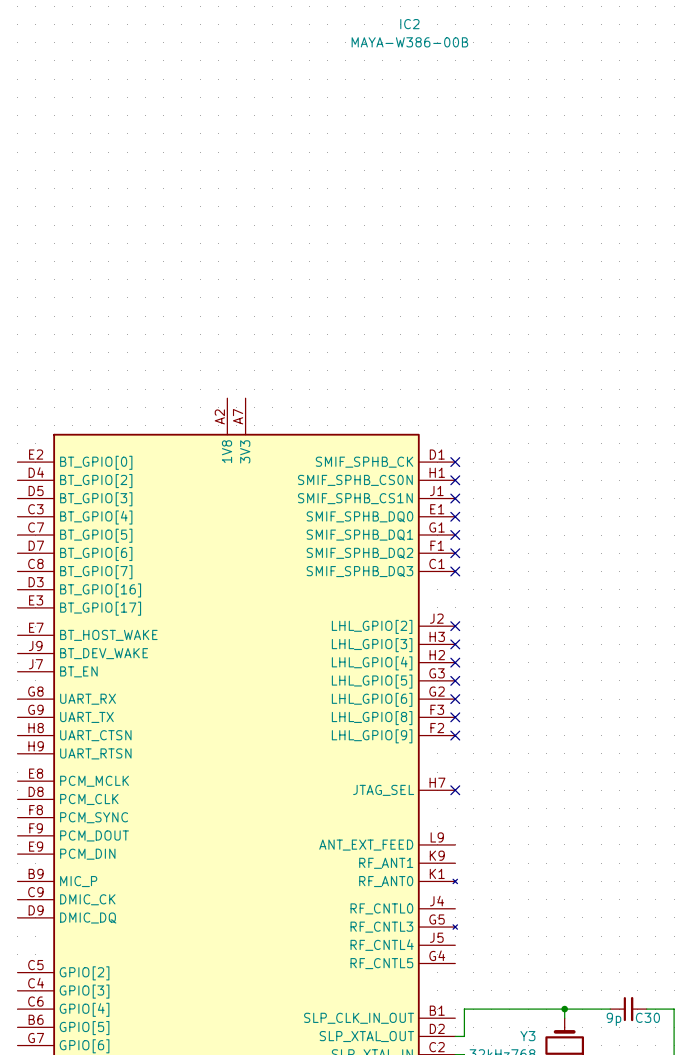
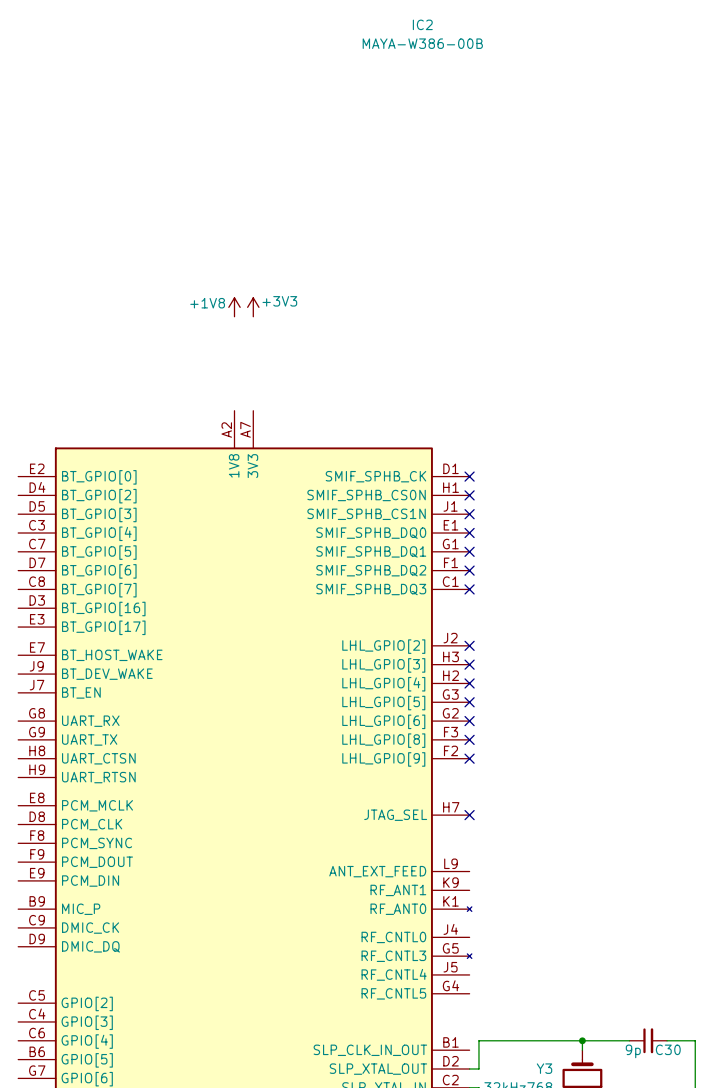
power symbol: none -> +1V8 (234, 307)
power symbol: none -> +3V3 (253, 307)

